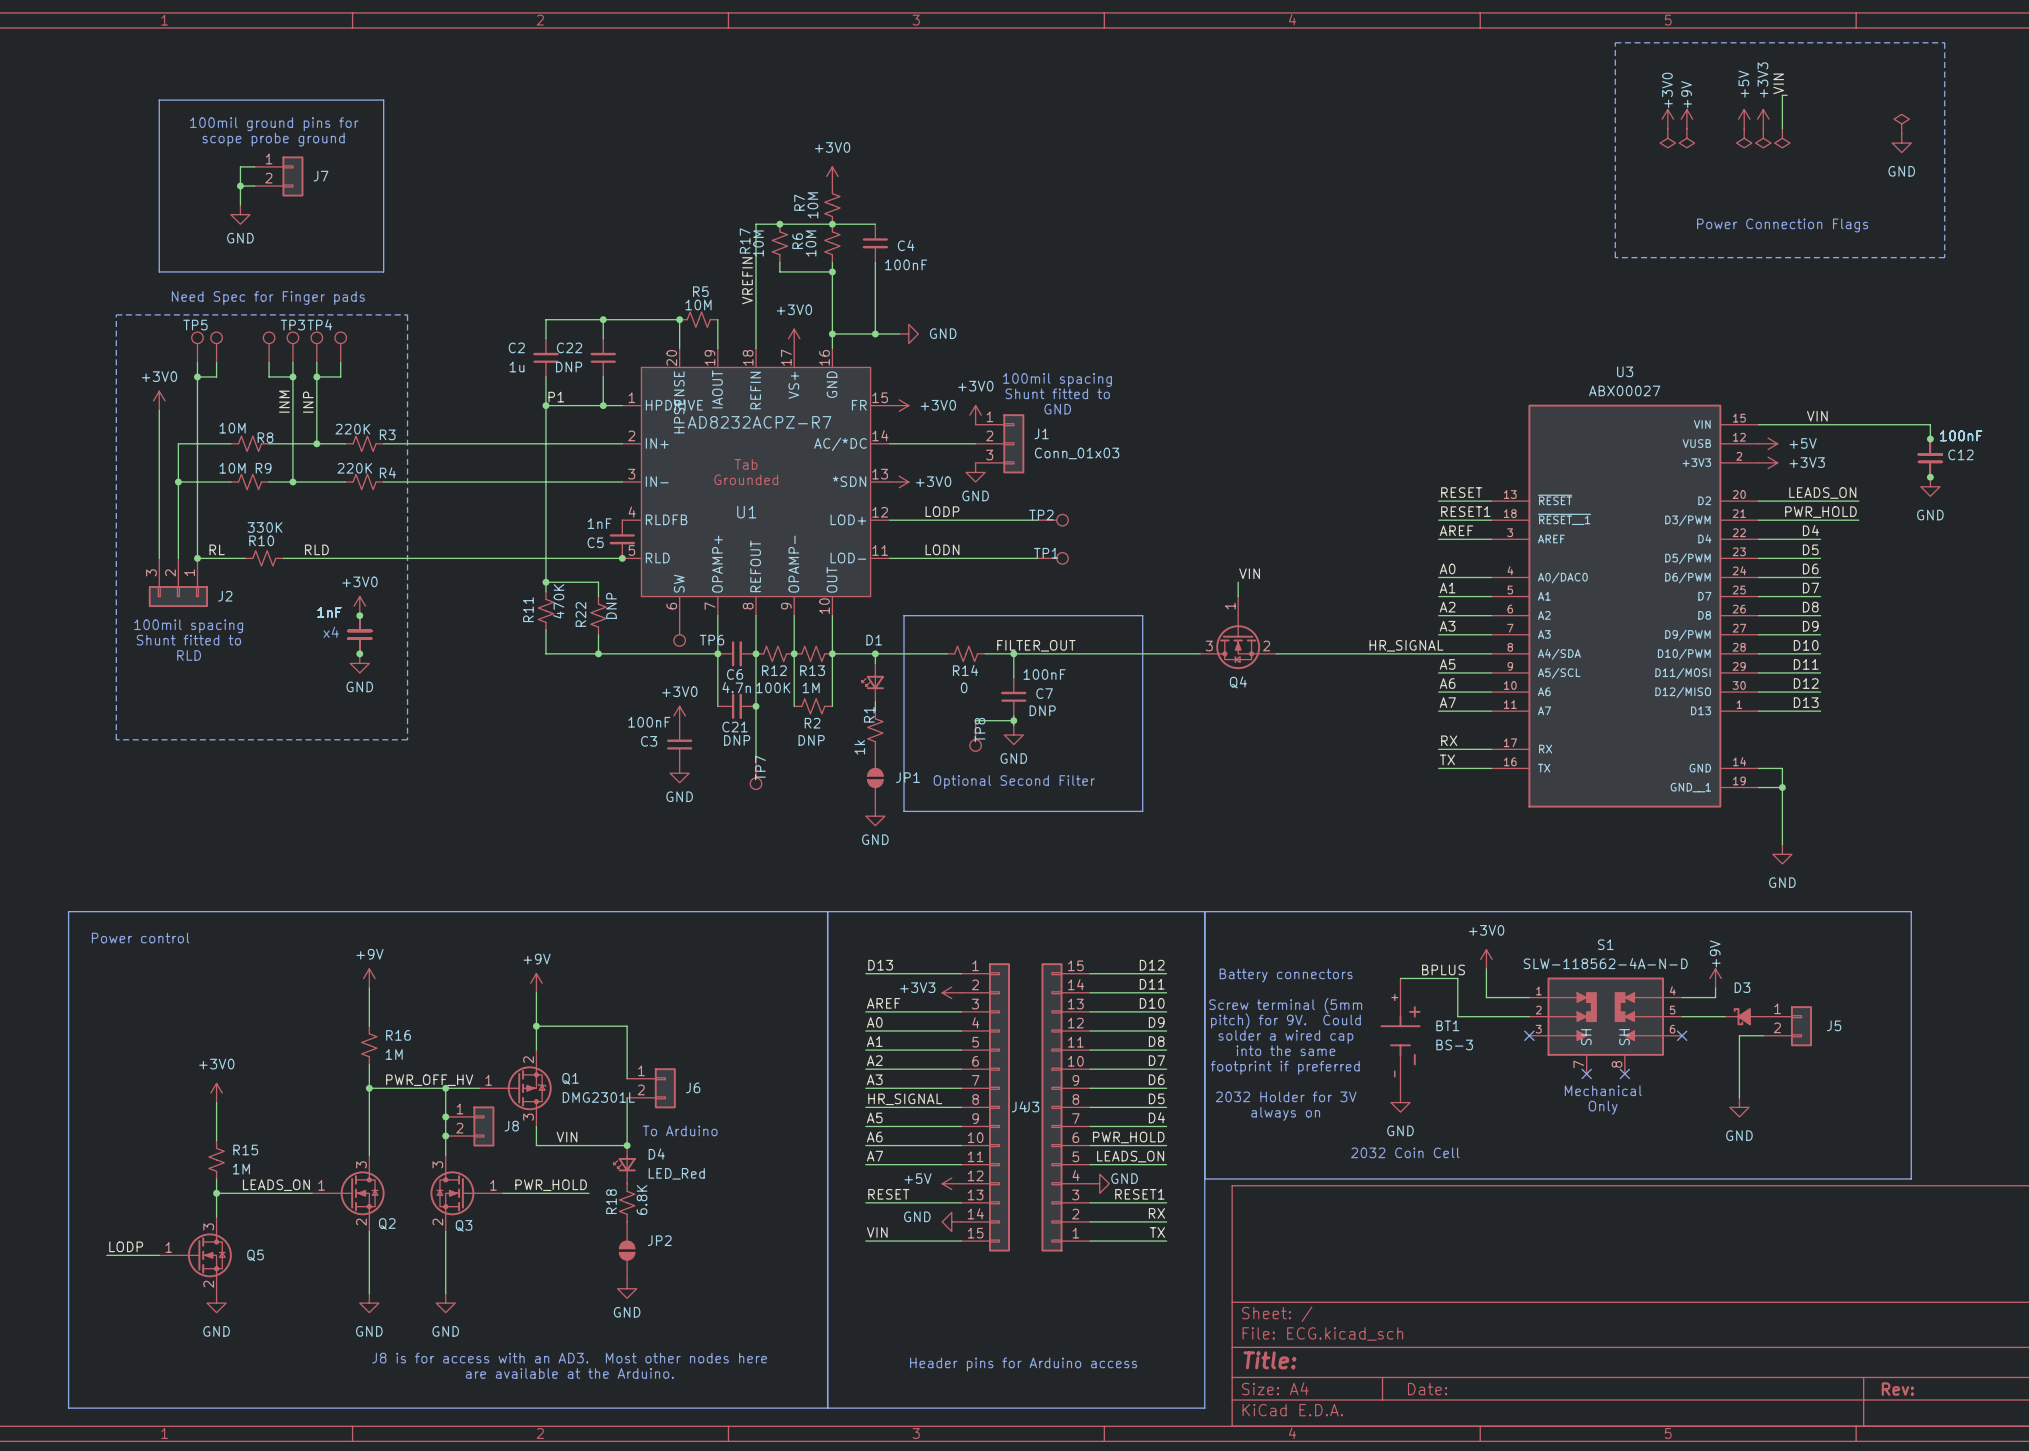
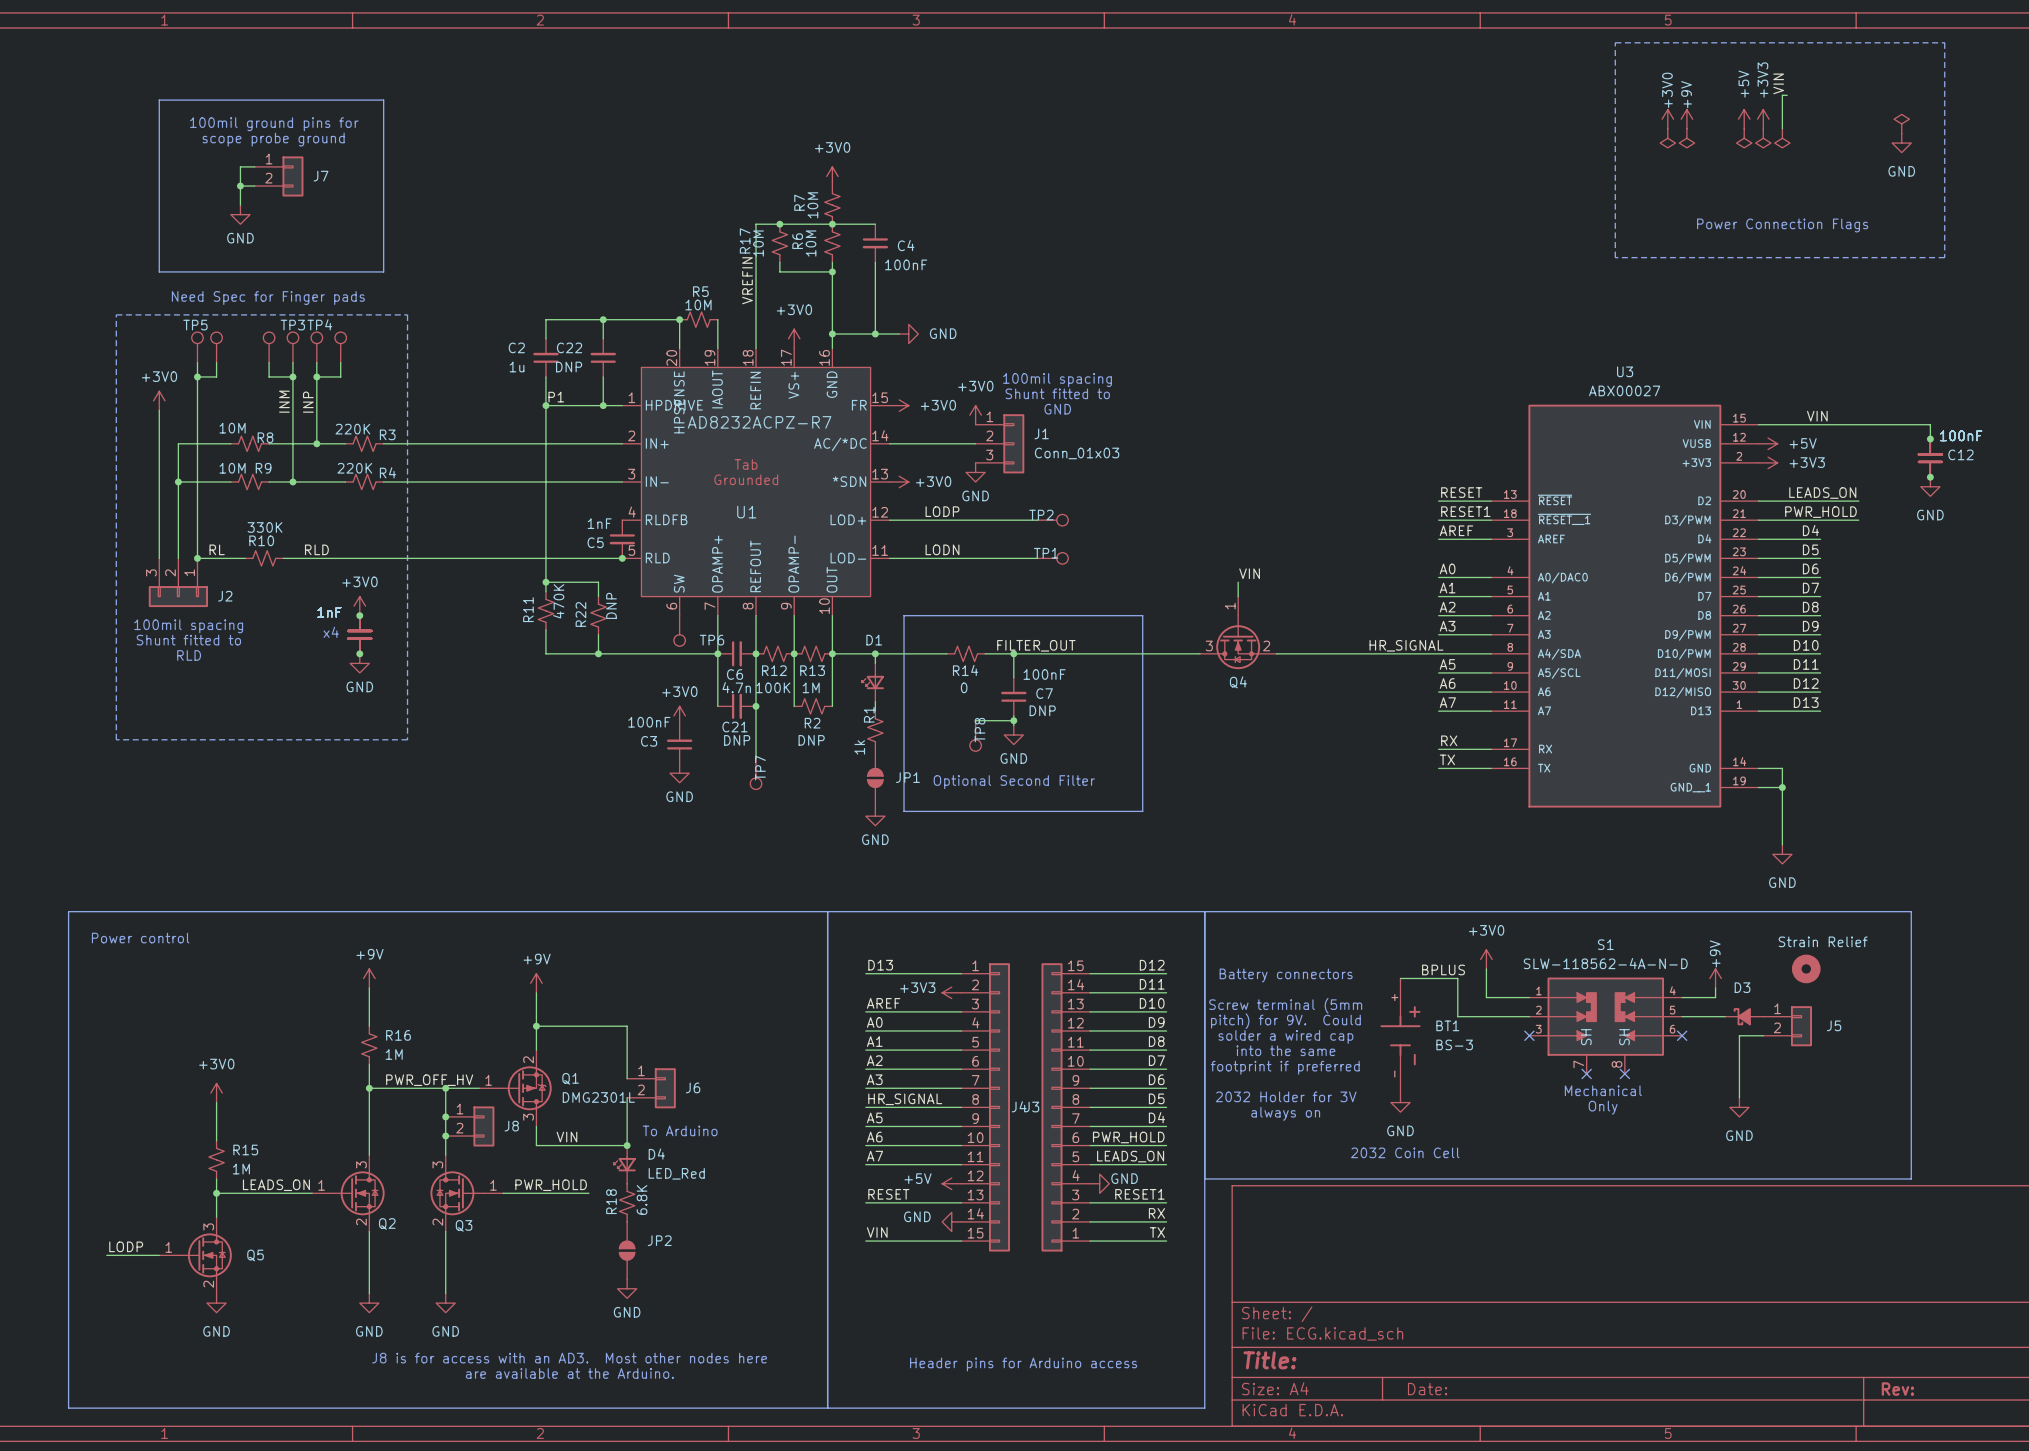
part: none -> Strain Relief (1806, 968)

